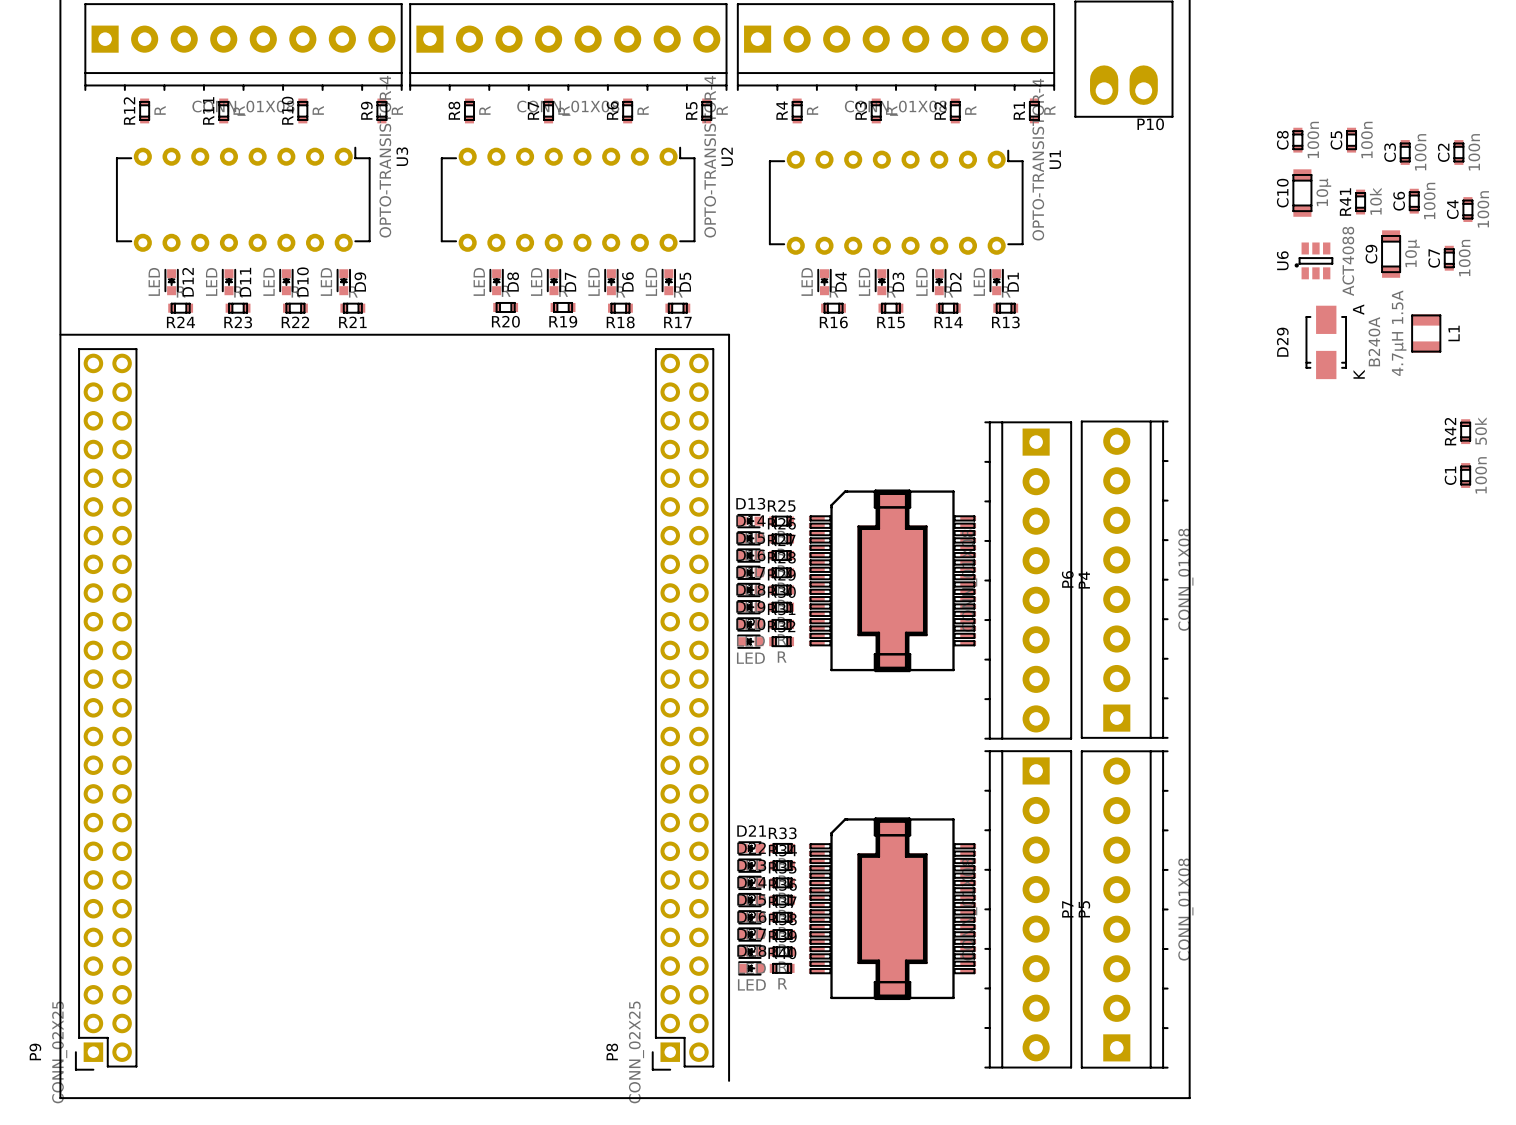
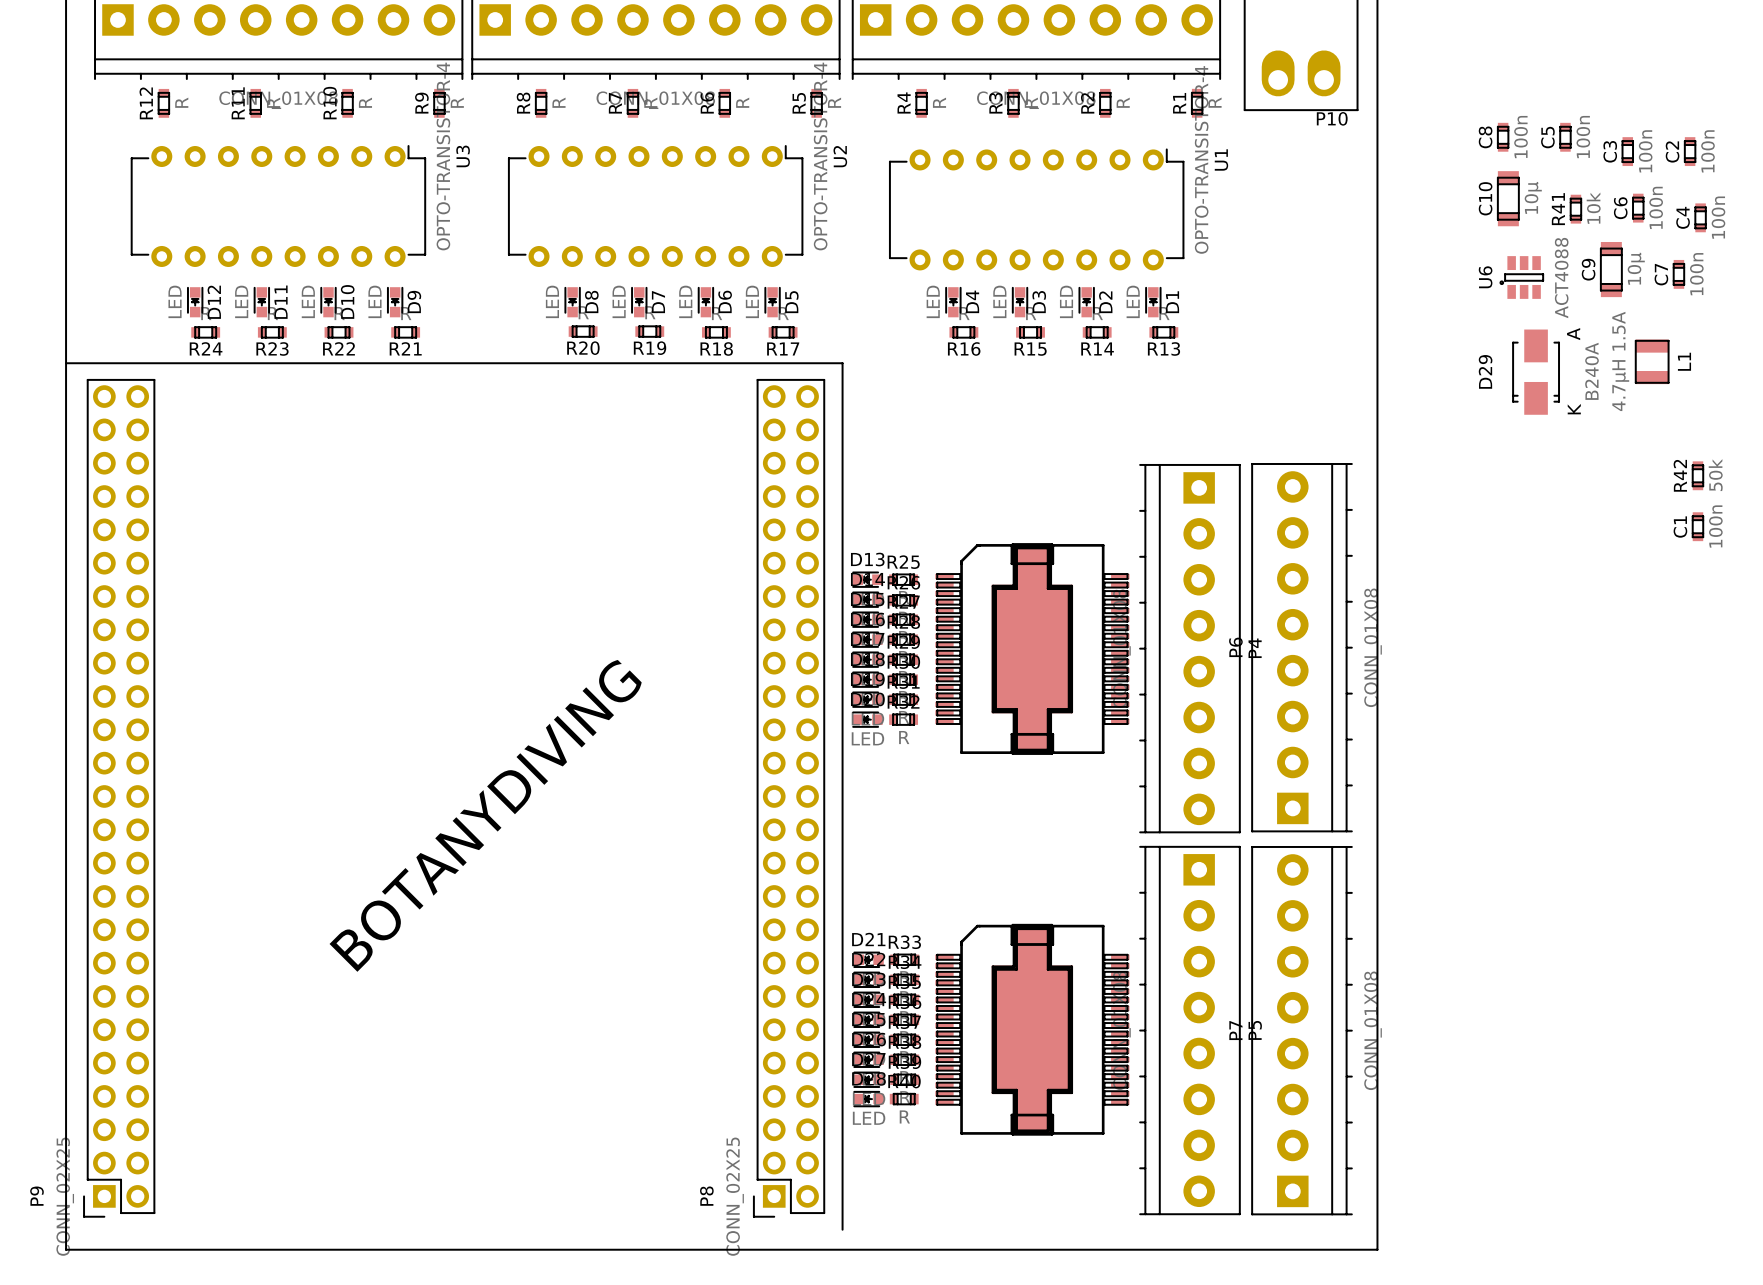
text: none -> BOTANYDIVING (485, 815)

